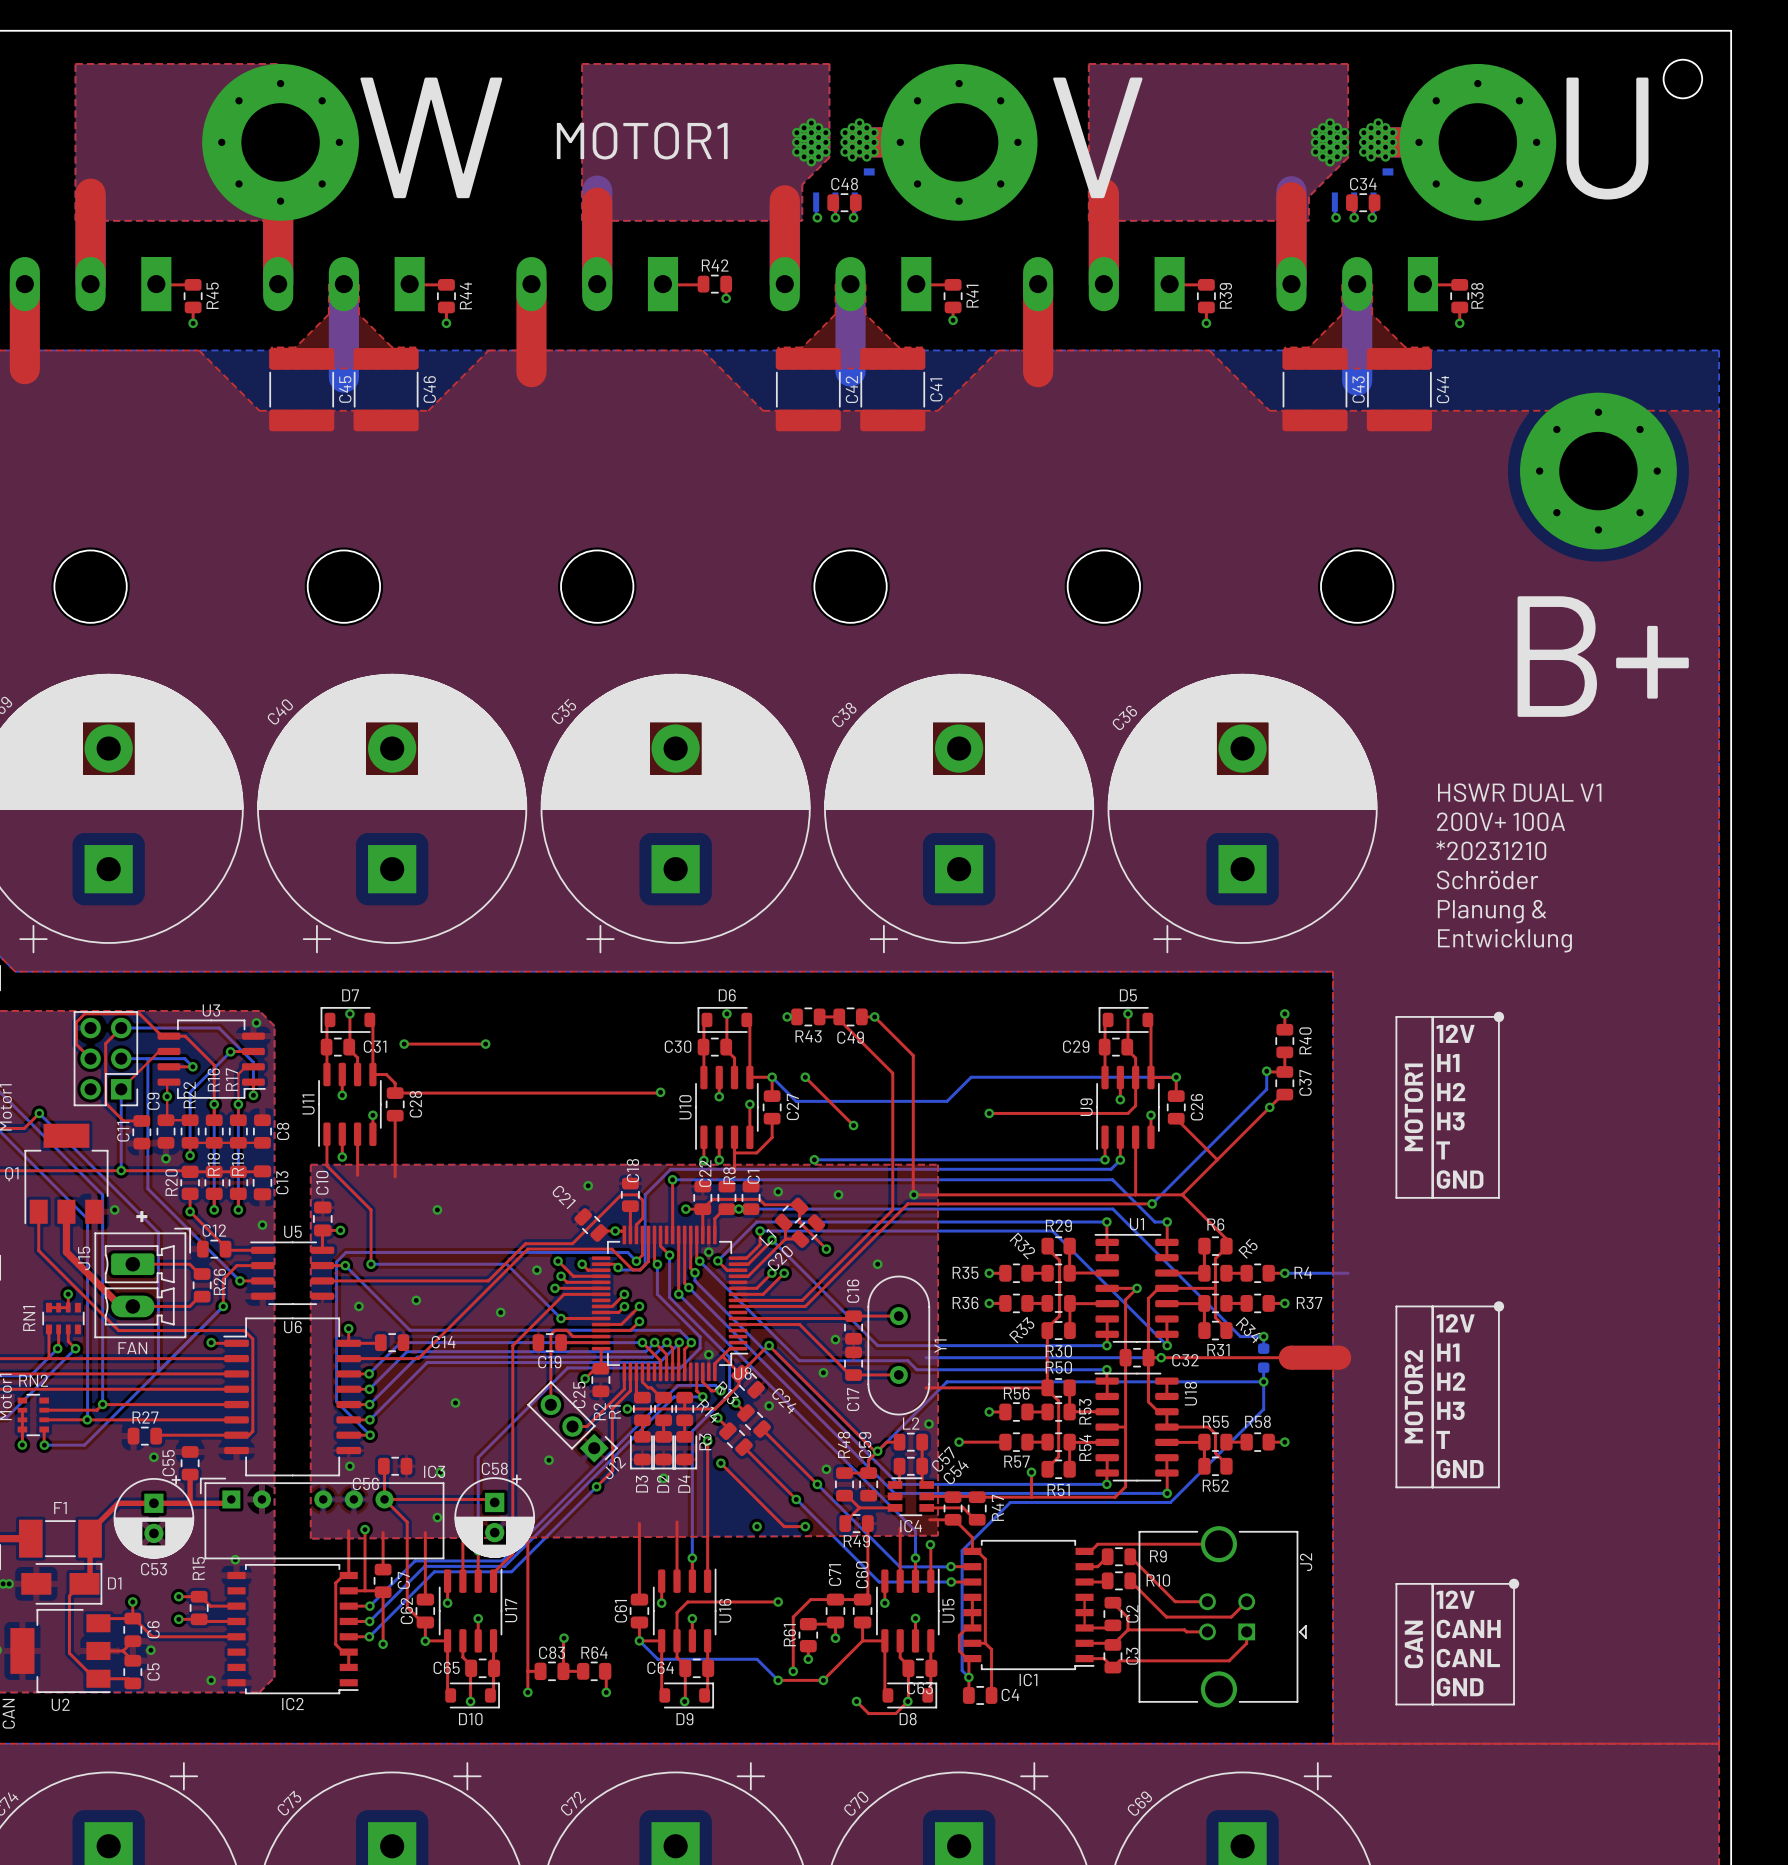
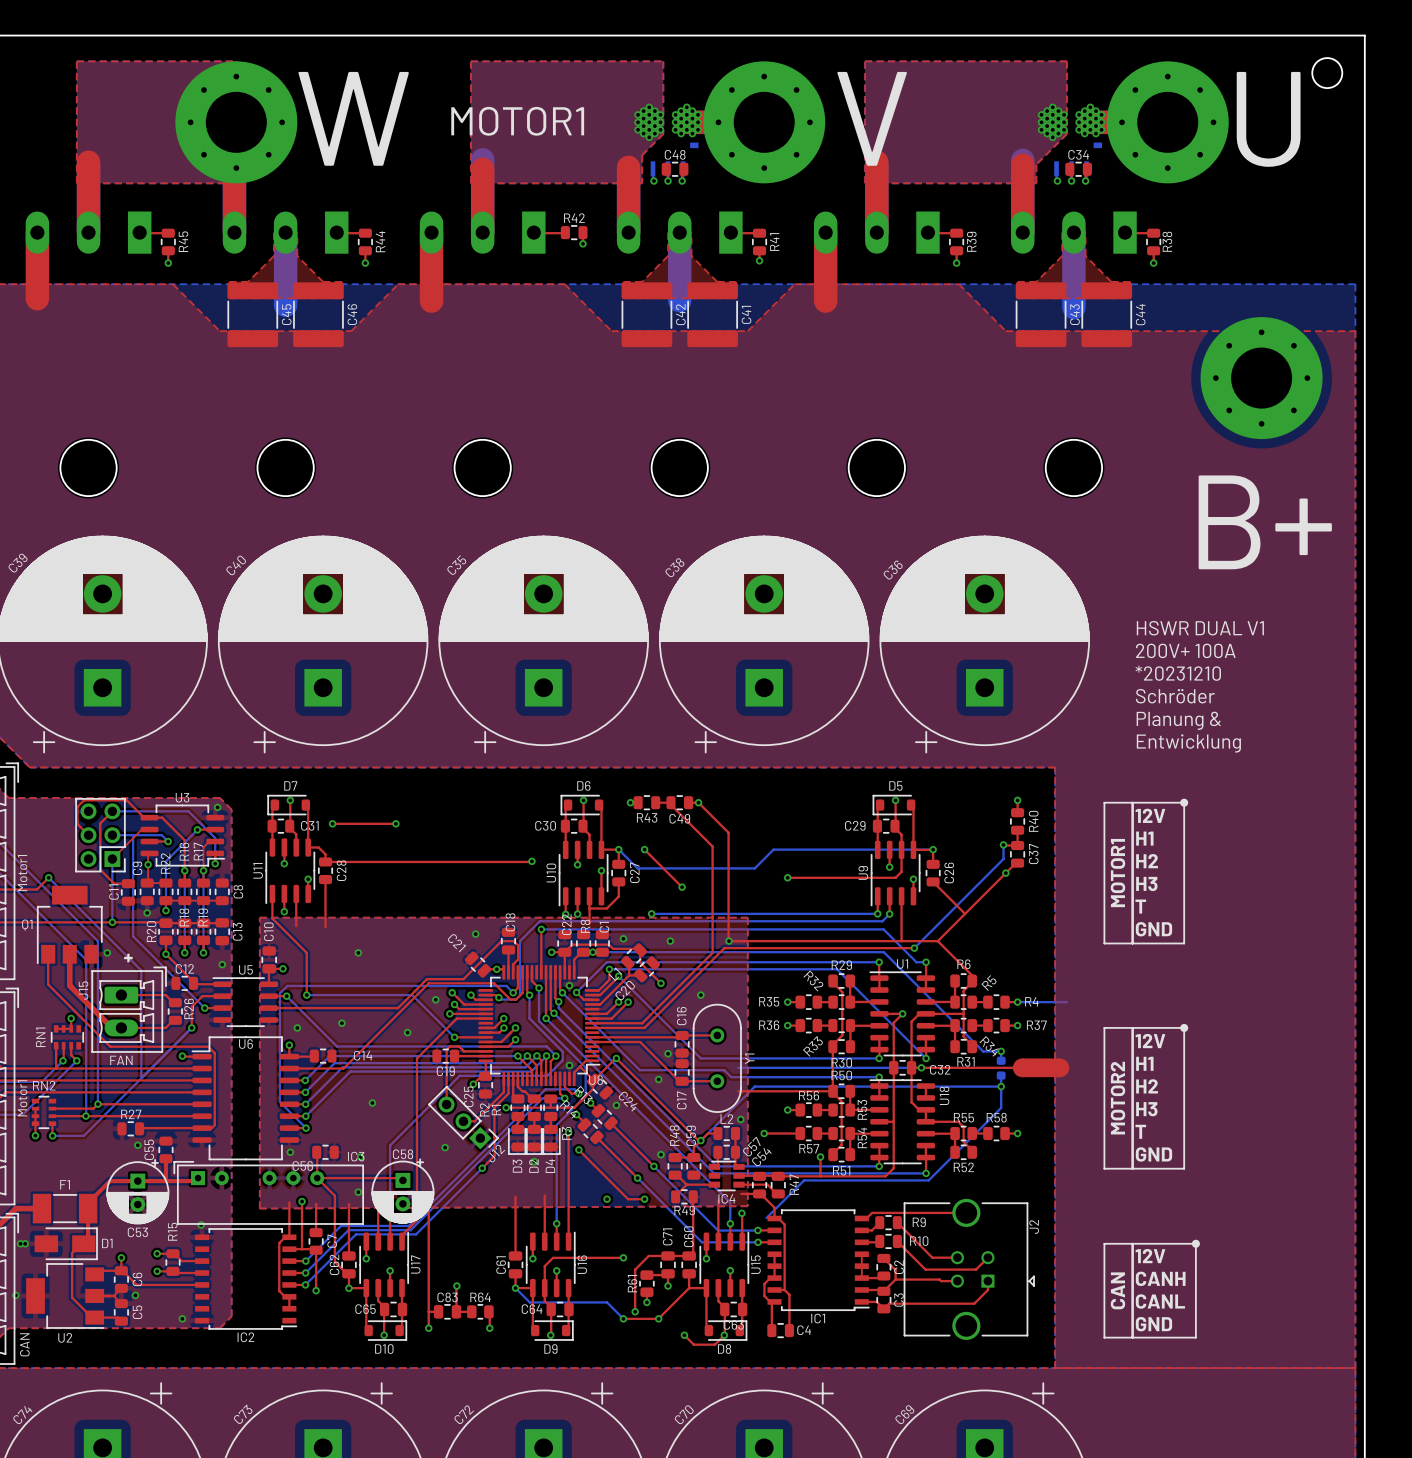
bottom track: (962, 1550) (962, 1670) (968, 1677) -> none
via: (968, 1677) -> none

